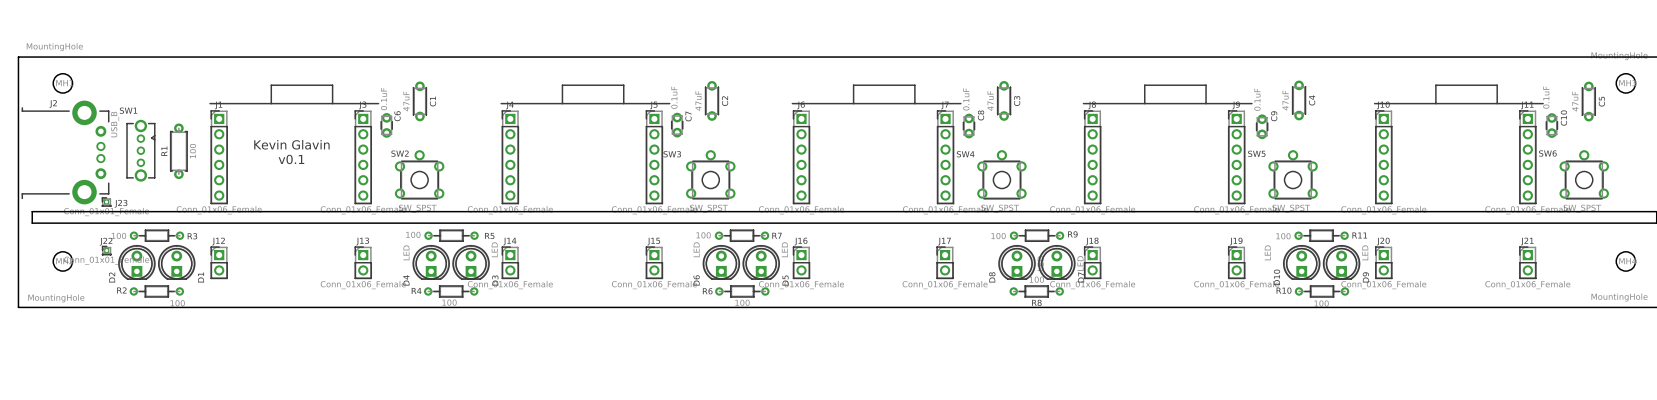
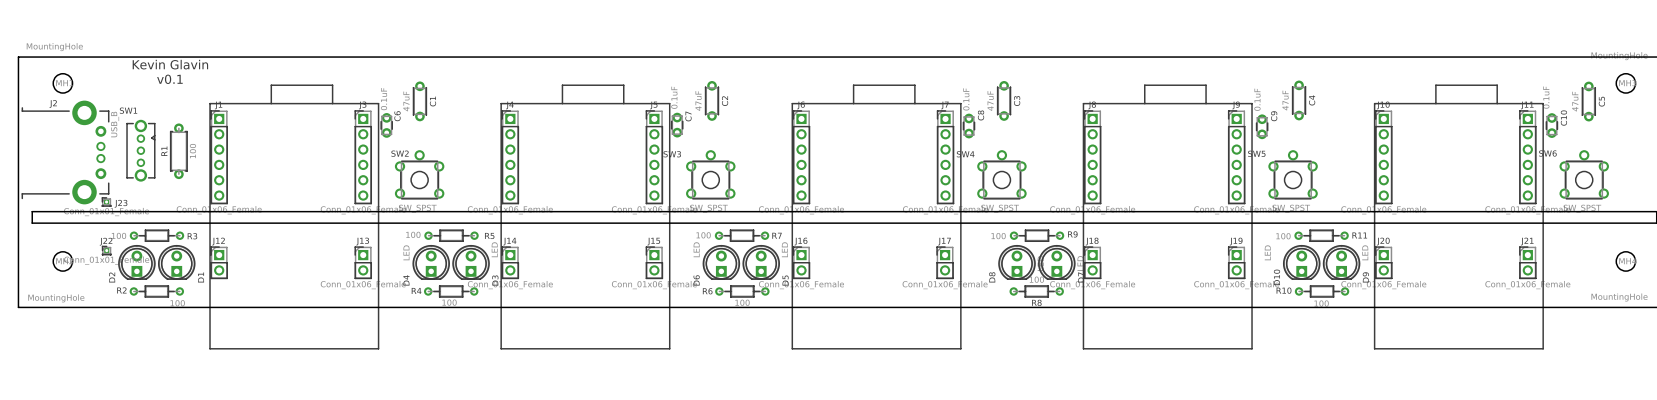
line: none -> (210, 103) (210, 348) (378, 348) (378, 103)
line: none -> (501, 103) (501, 348) (669, 348) (669, 103)
line: none -> (792, 103) (792, 348) (960, 348) (960, 103)
line: none -> (1083, 103) (1083, 348) (1252, 348) (1252, 103)
line: none -> (1374, 103) (1374, 348) (1543, 348) (1543, 103)
text position: Kevin Glavin (291, 144) -> Kevin Glavin (170, 64)
text position: v0.1 (291, 159) -> v0.1 (169, 79)

